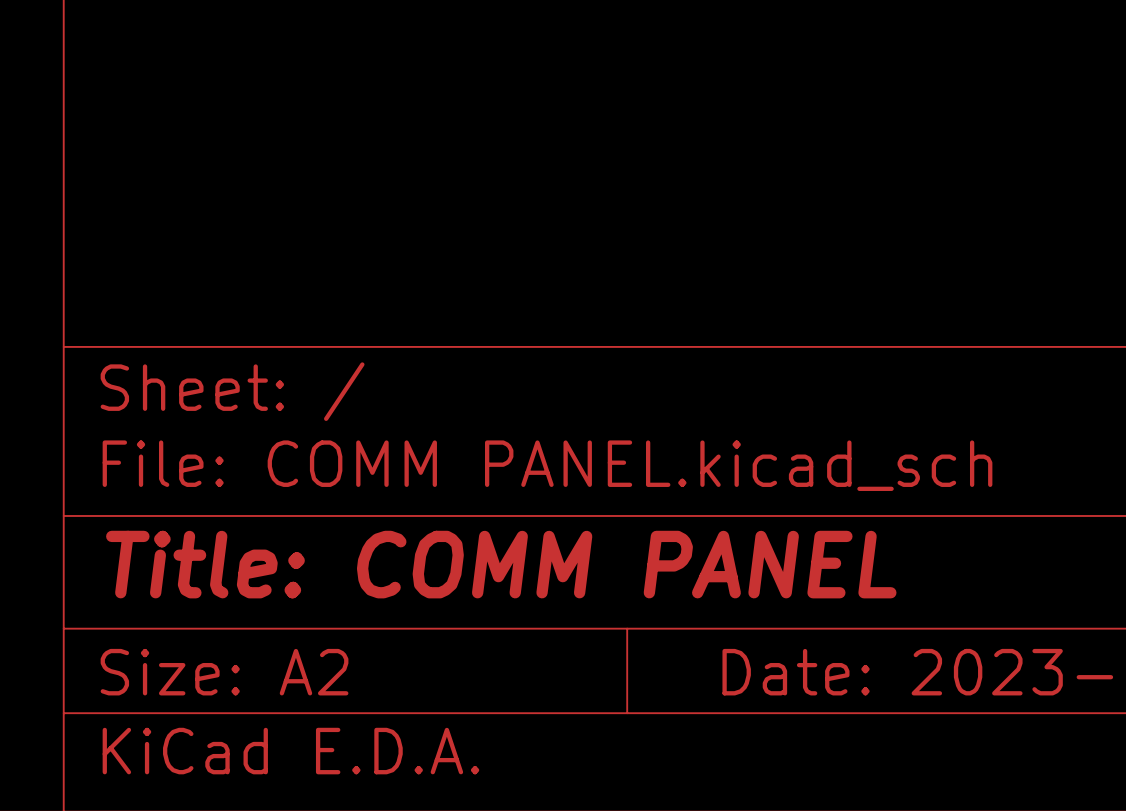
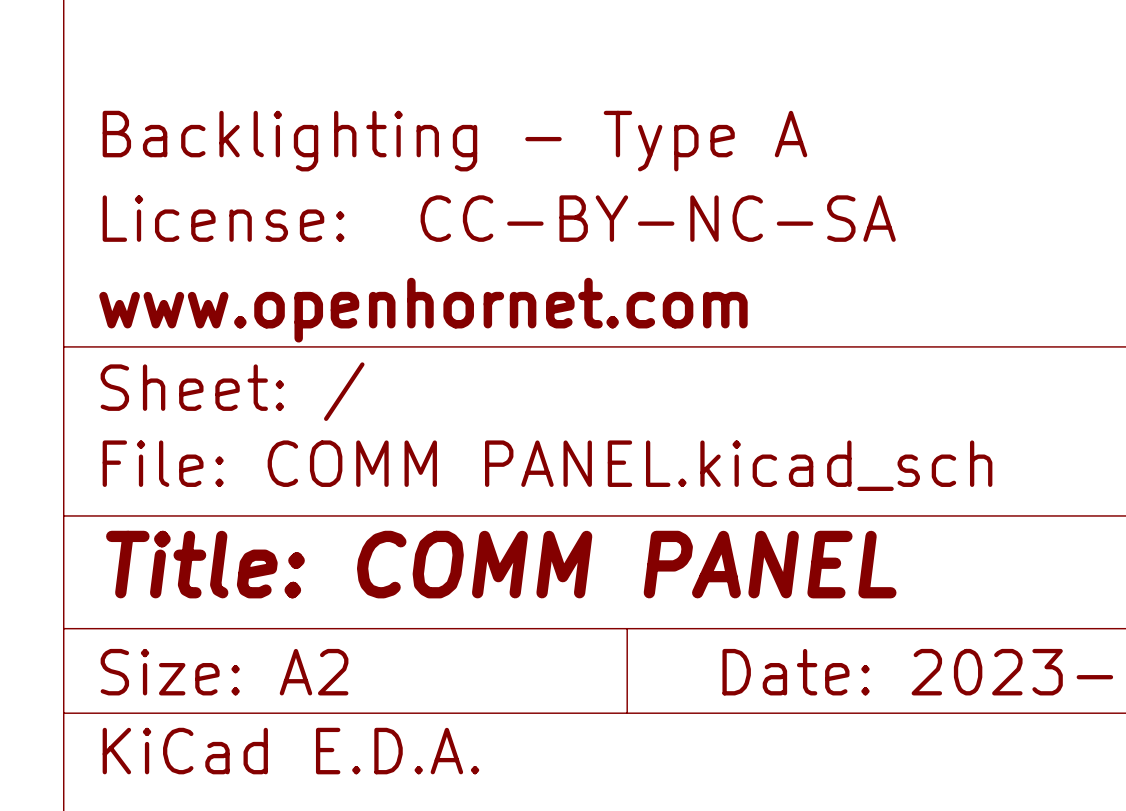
title block: none -> Backlighting - Type A (454, 141)
title block: none -> License: CC-BY-NC-SA (499, 218)
title block: none -> www.openhornet.com (423, 310)

